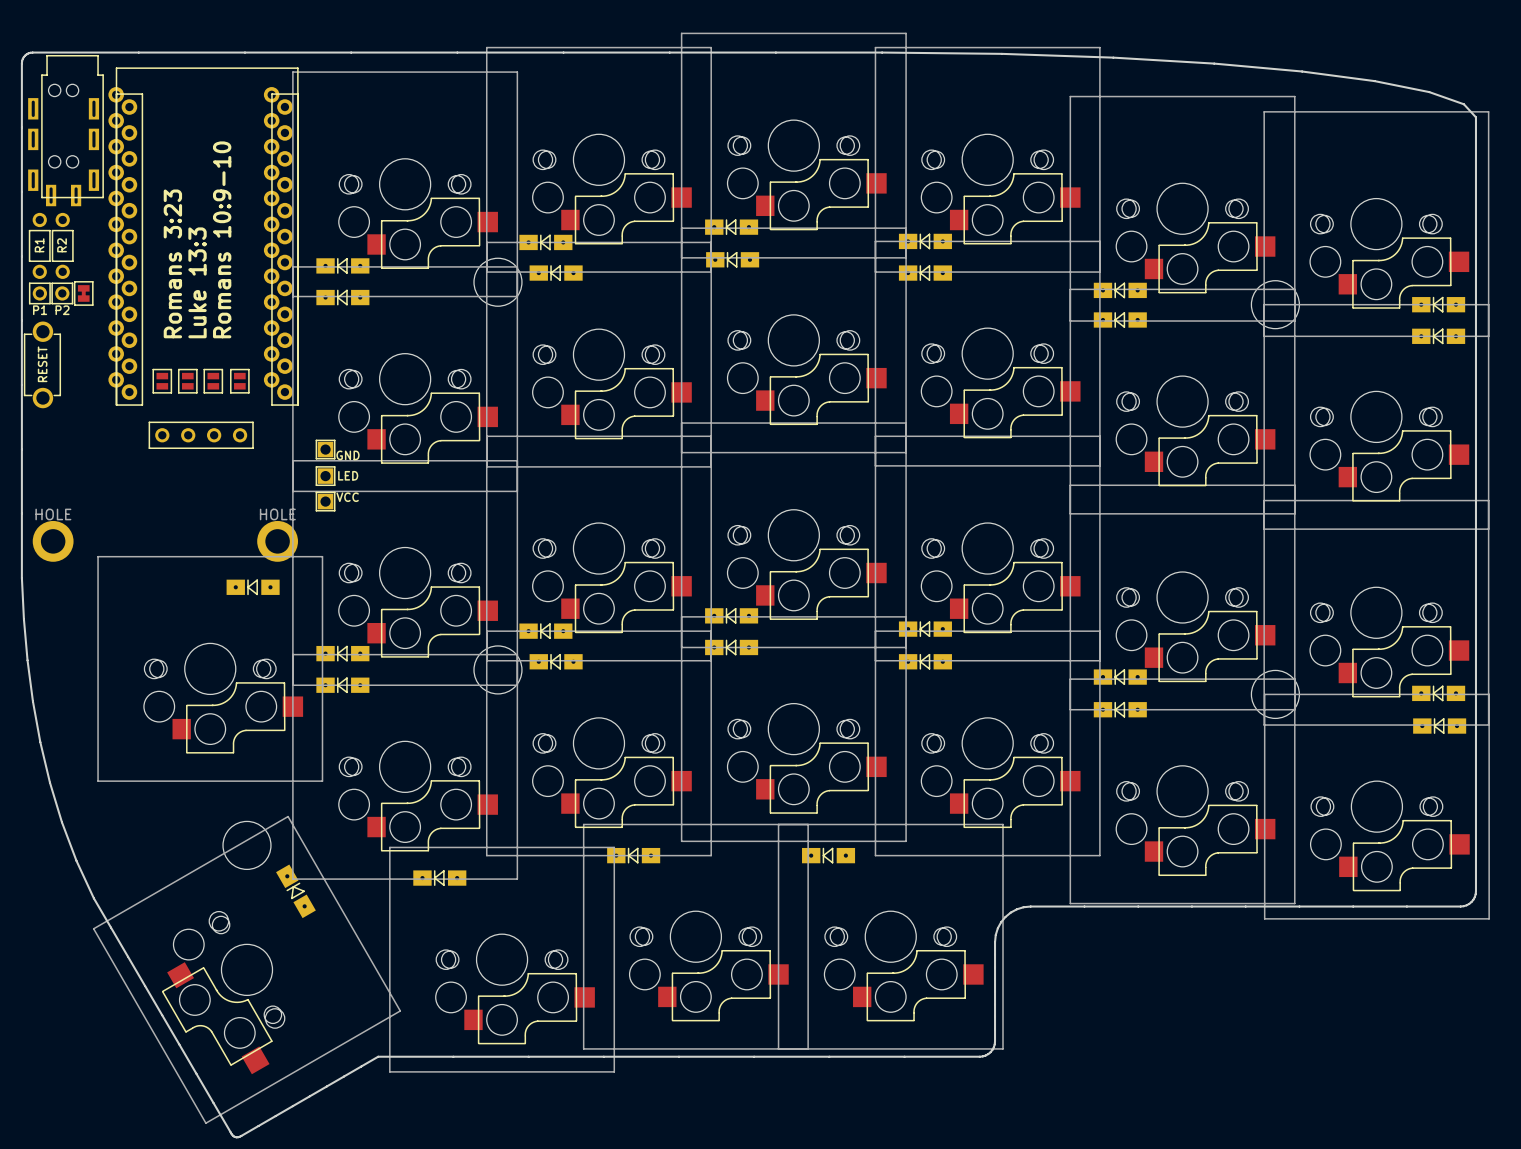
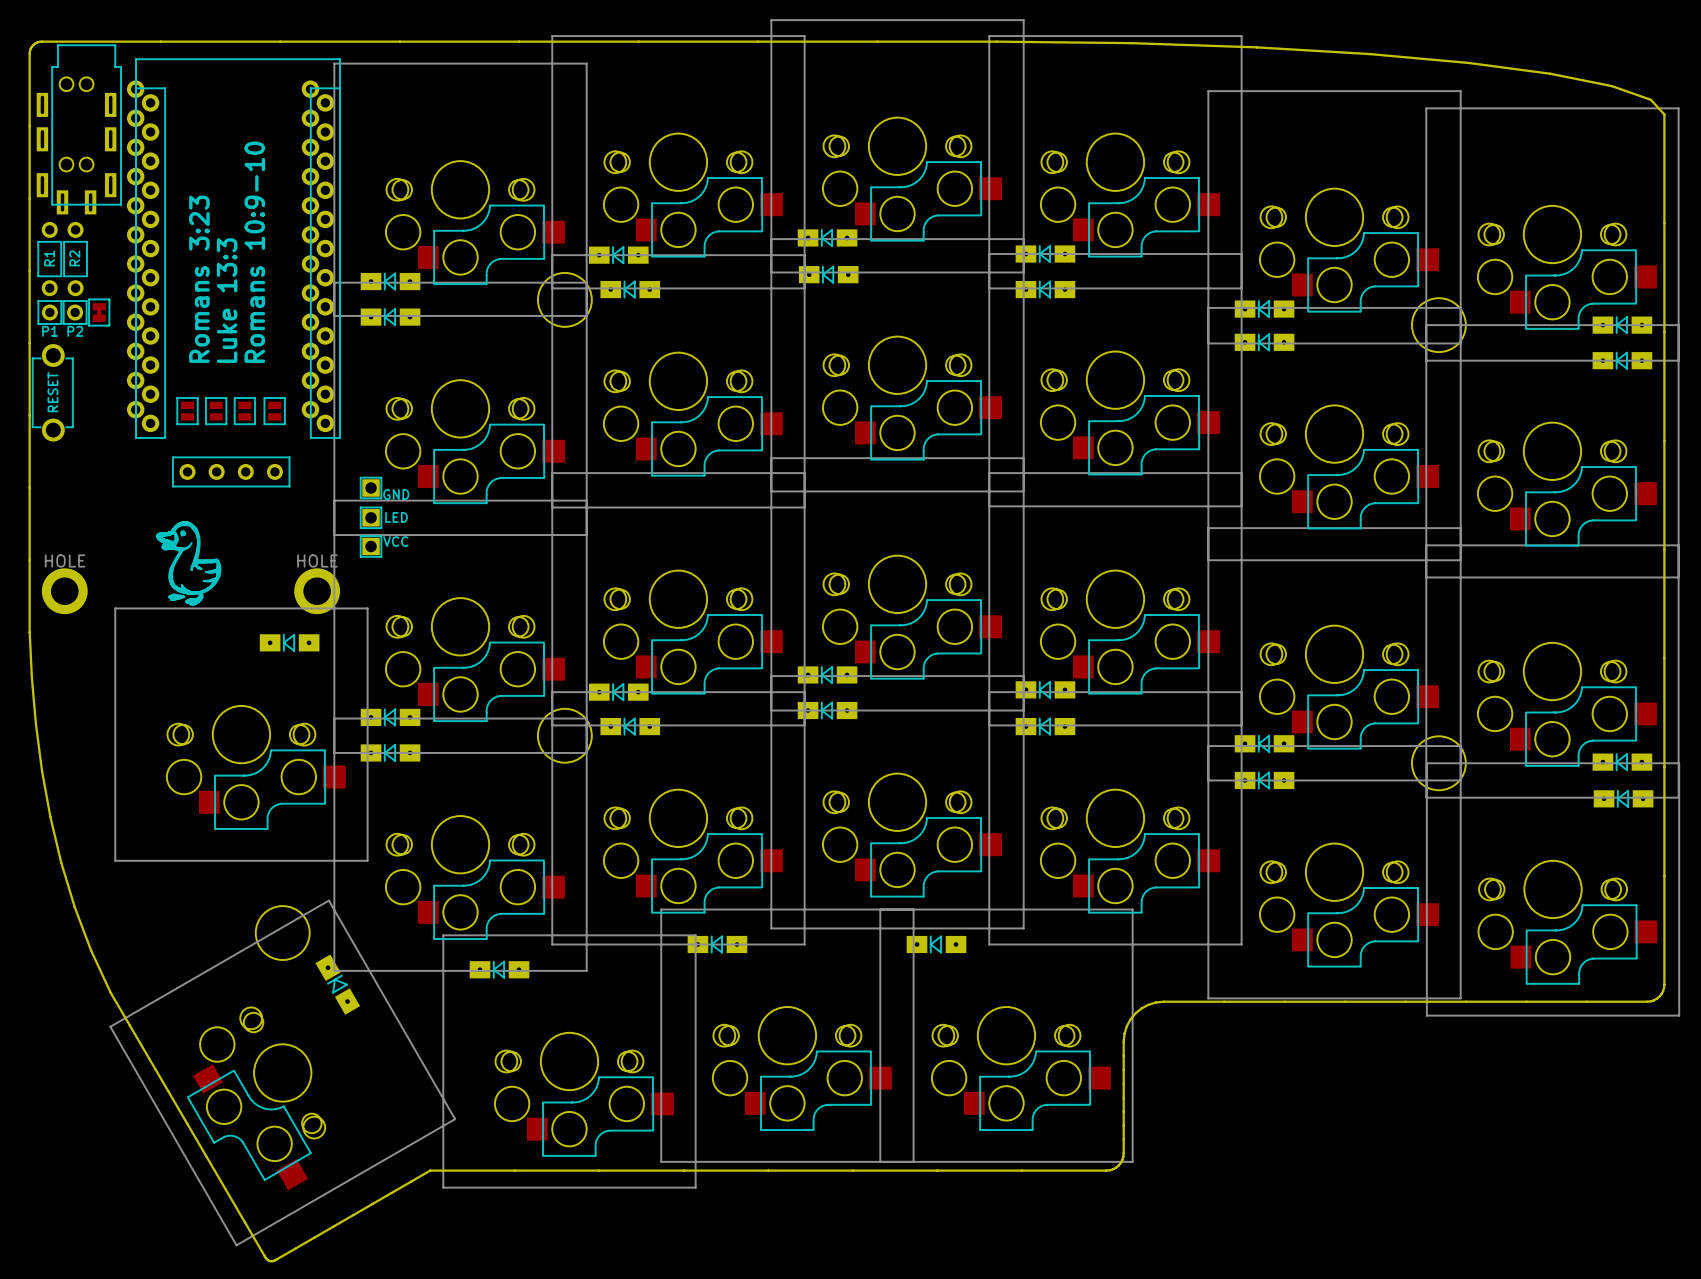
drawing: none -> [156, 521, 222, 606]

